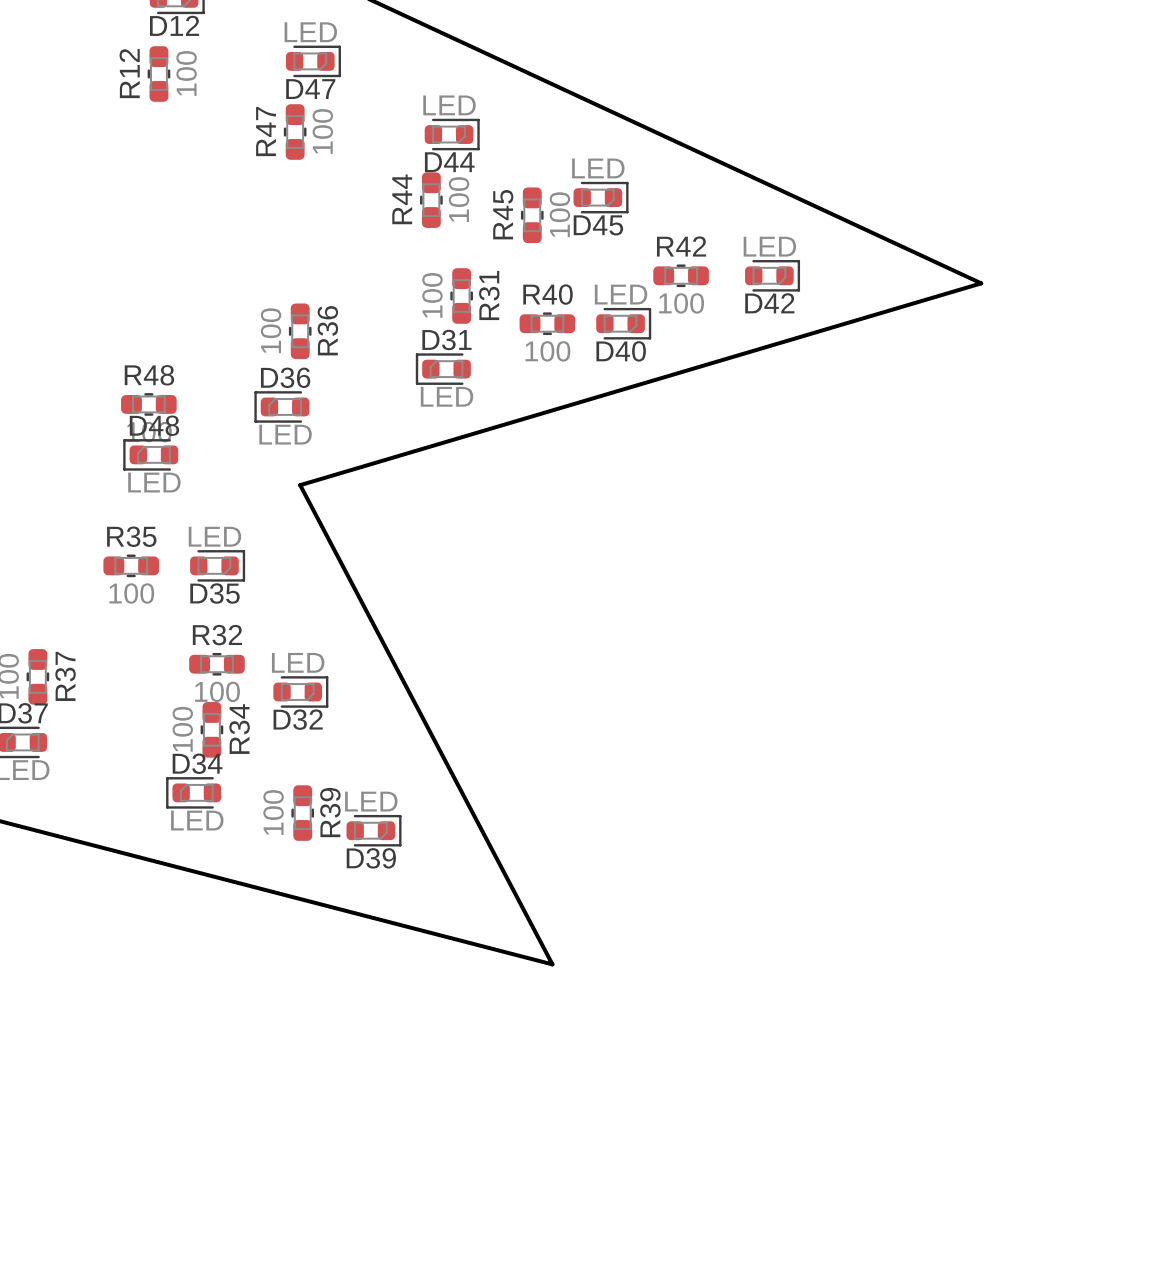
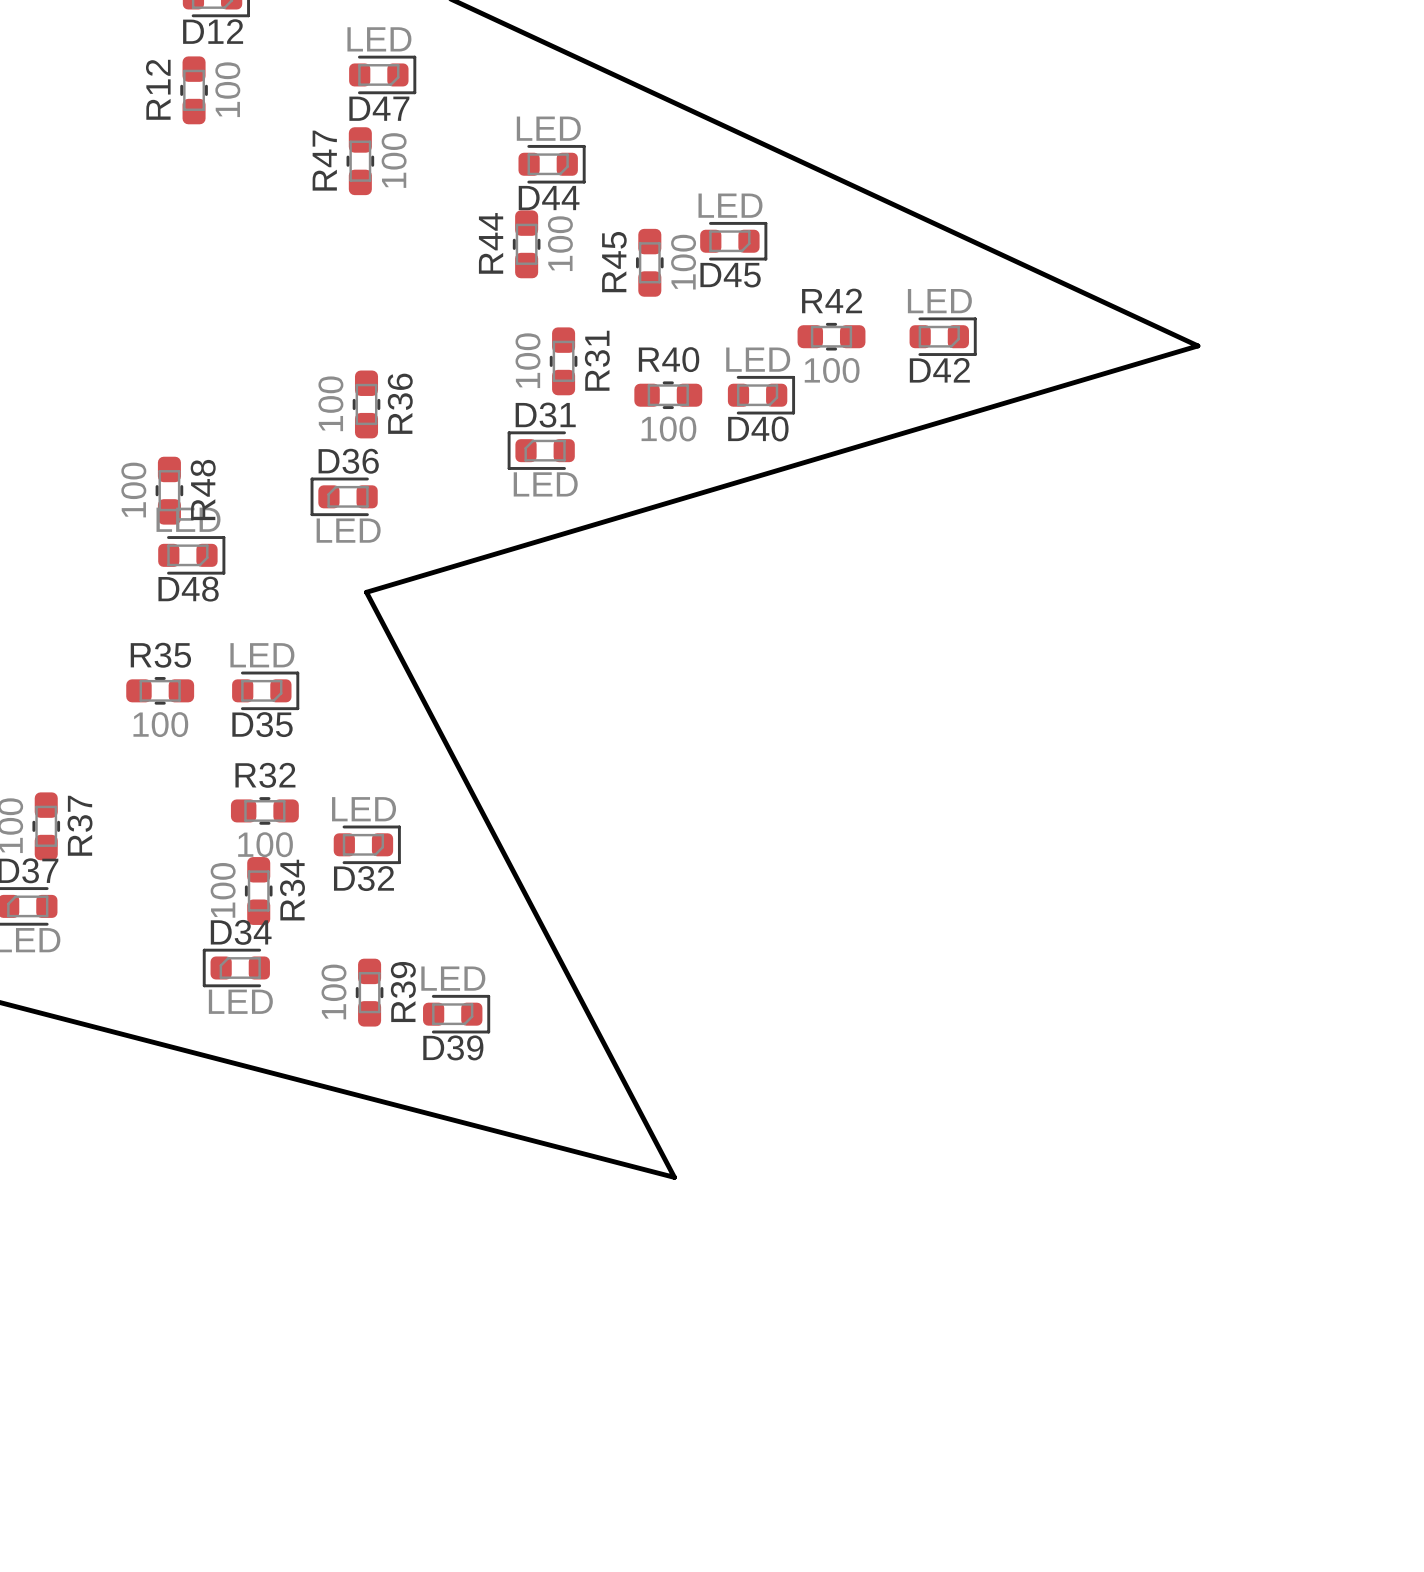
R48 rotation: 0° (148, 404) -> 90° clockwise (169, 490)
D48 rotation: 0° (150, 454) -> 180° (191, 555)

